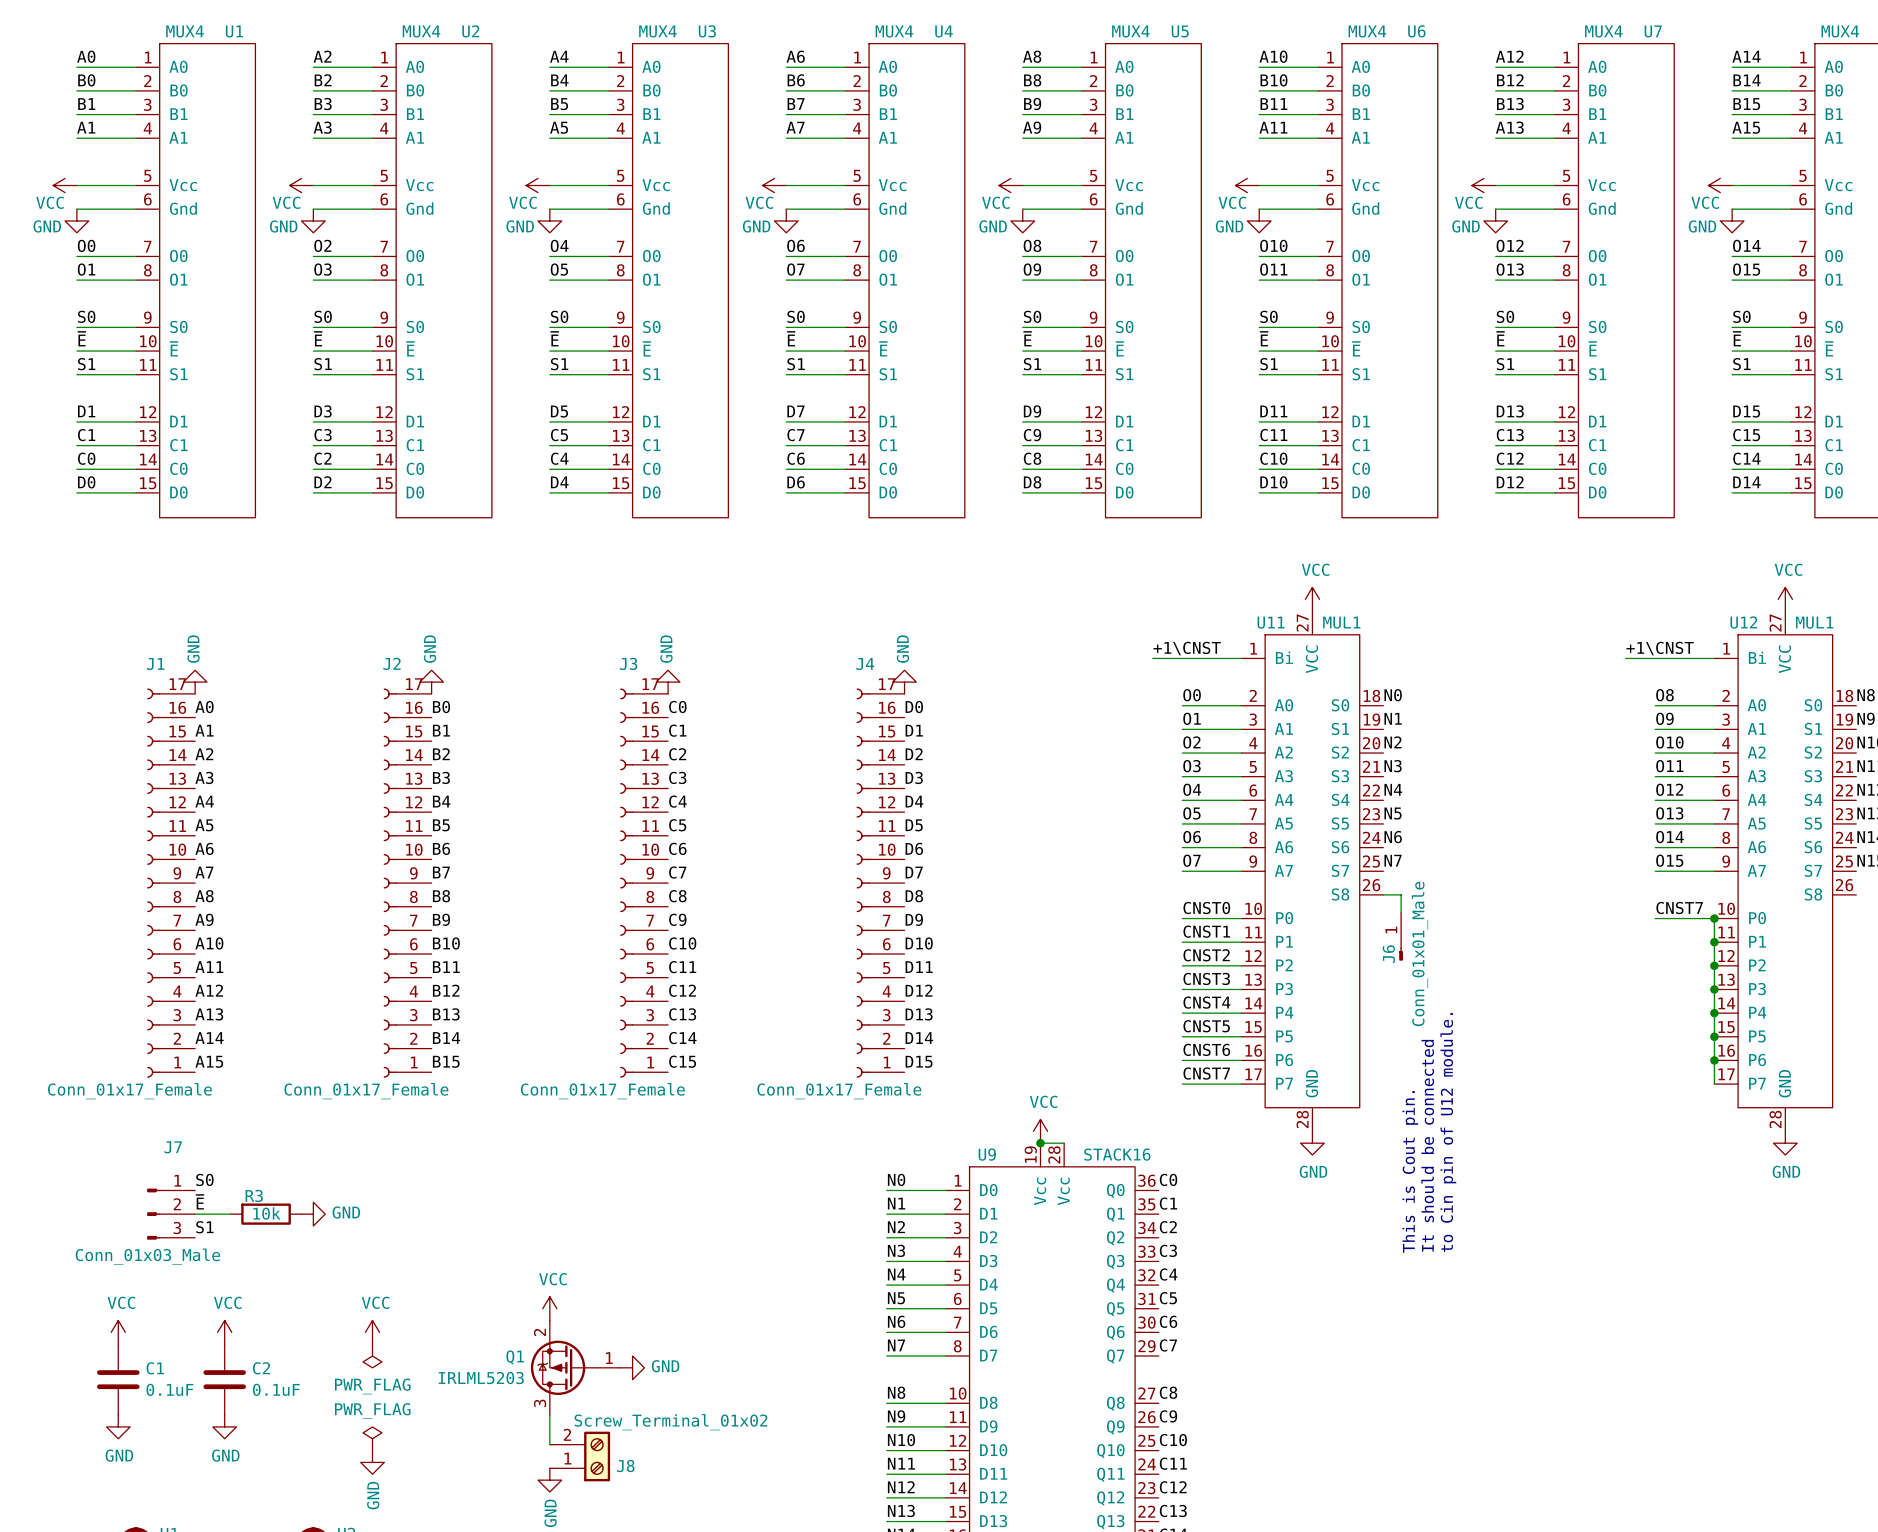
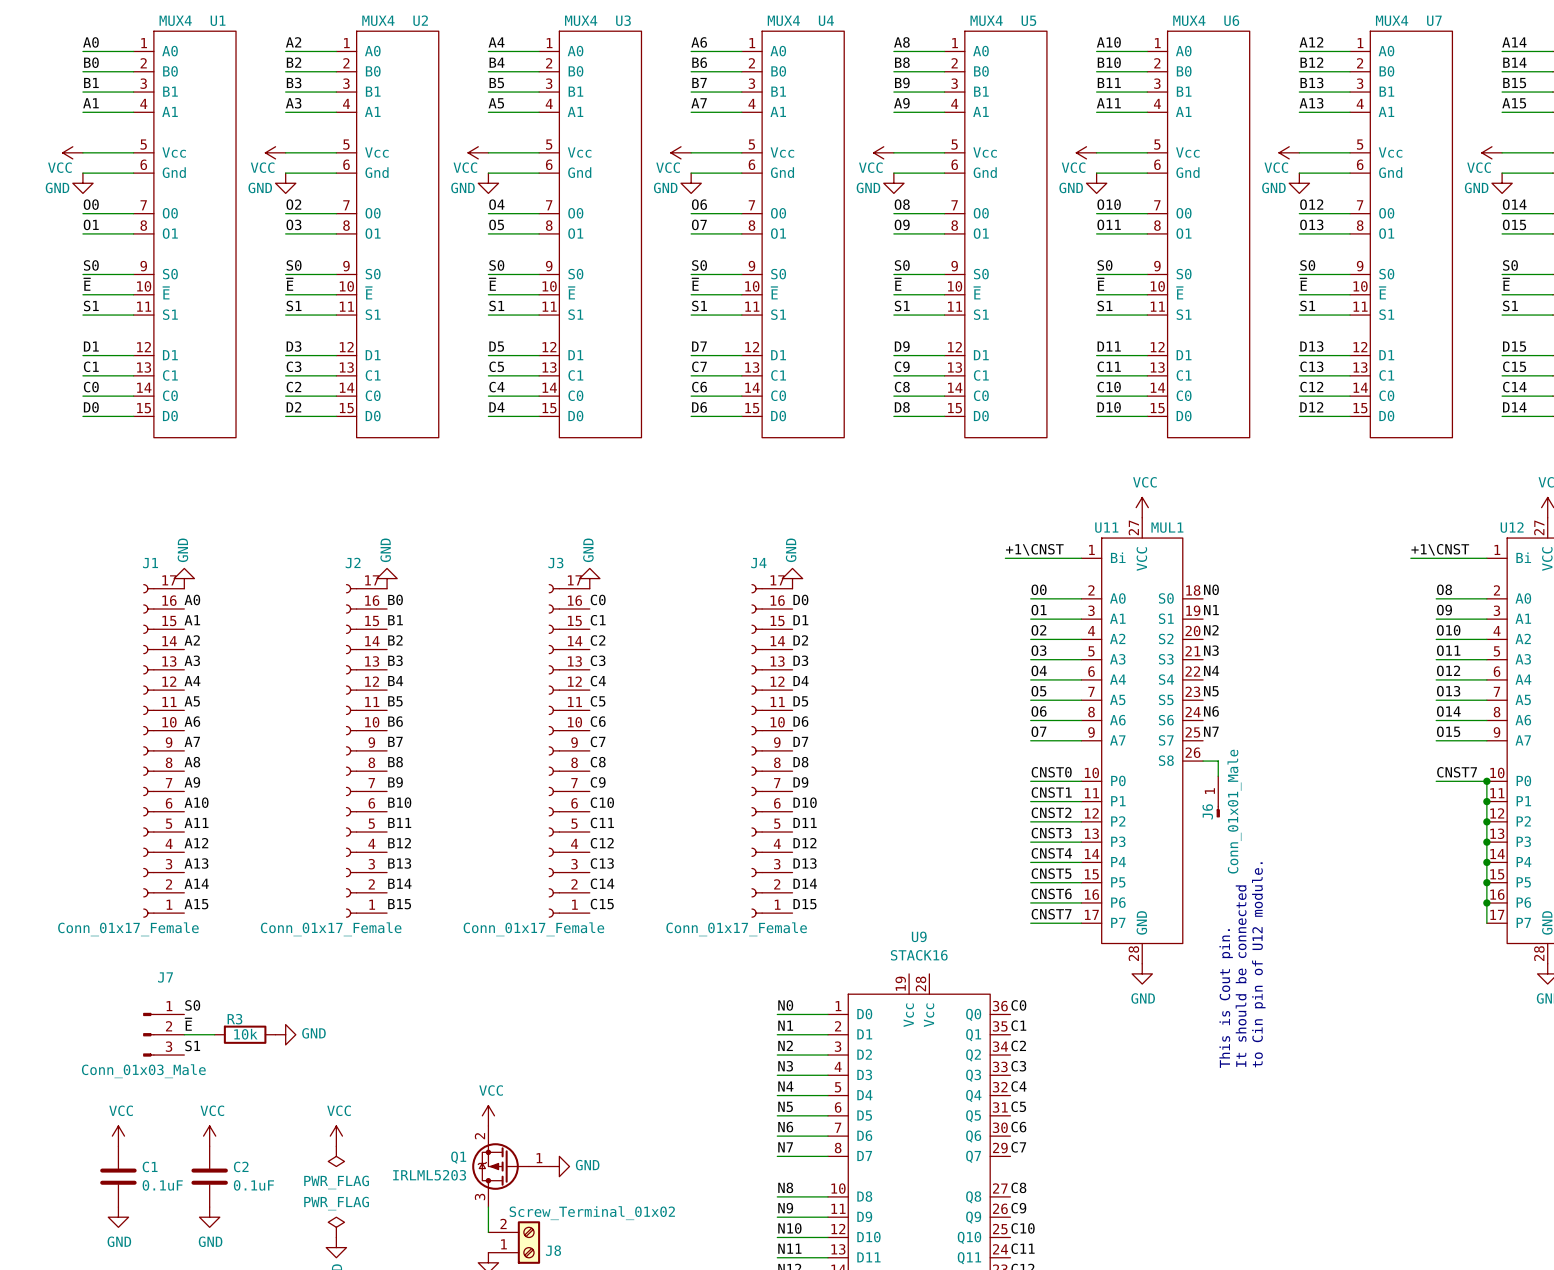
power symbol: VCC (1040, 1131) -> none
wire: (1040, 1143) (1064, 1143) -> none
junction: (1040, 1143) -> none
U9 name position: U9 (987, 1154) -> U9 (919, 936)
U9 value position: STACK16 (1117, 1154) -> STACK16 (919, 955)

